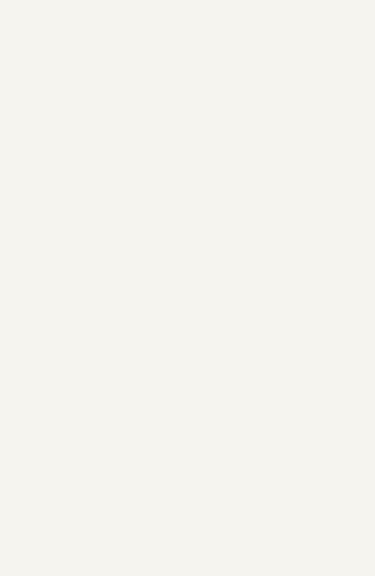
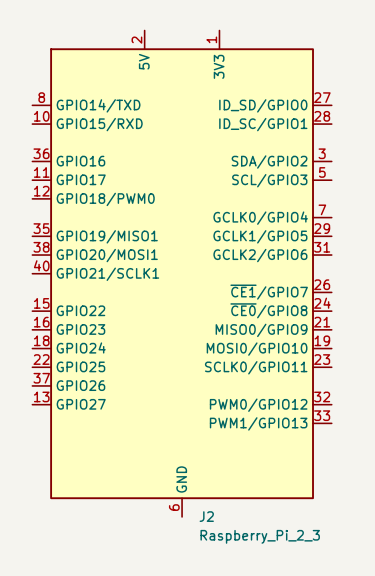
J2: none -> Raspberry_Pi_2_3 (182, 273)

